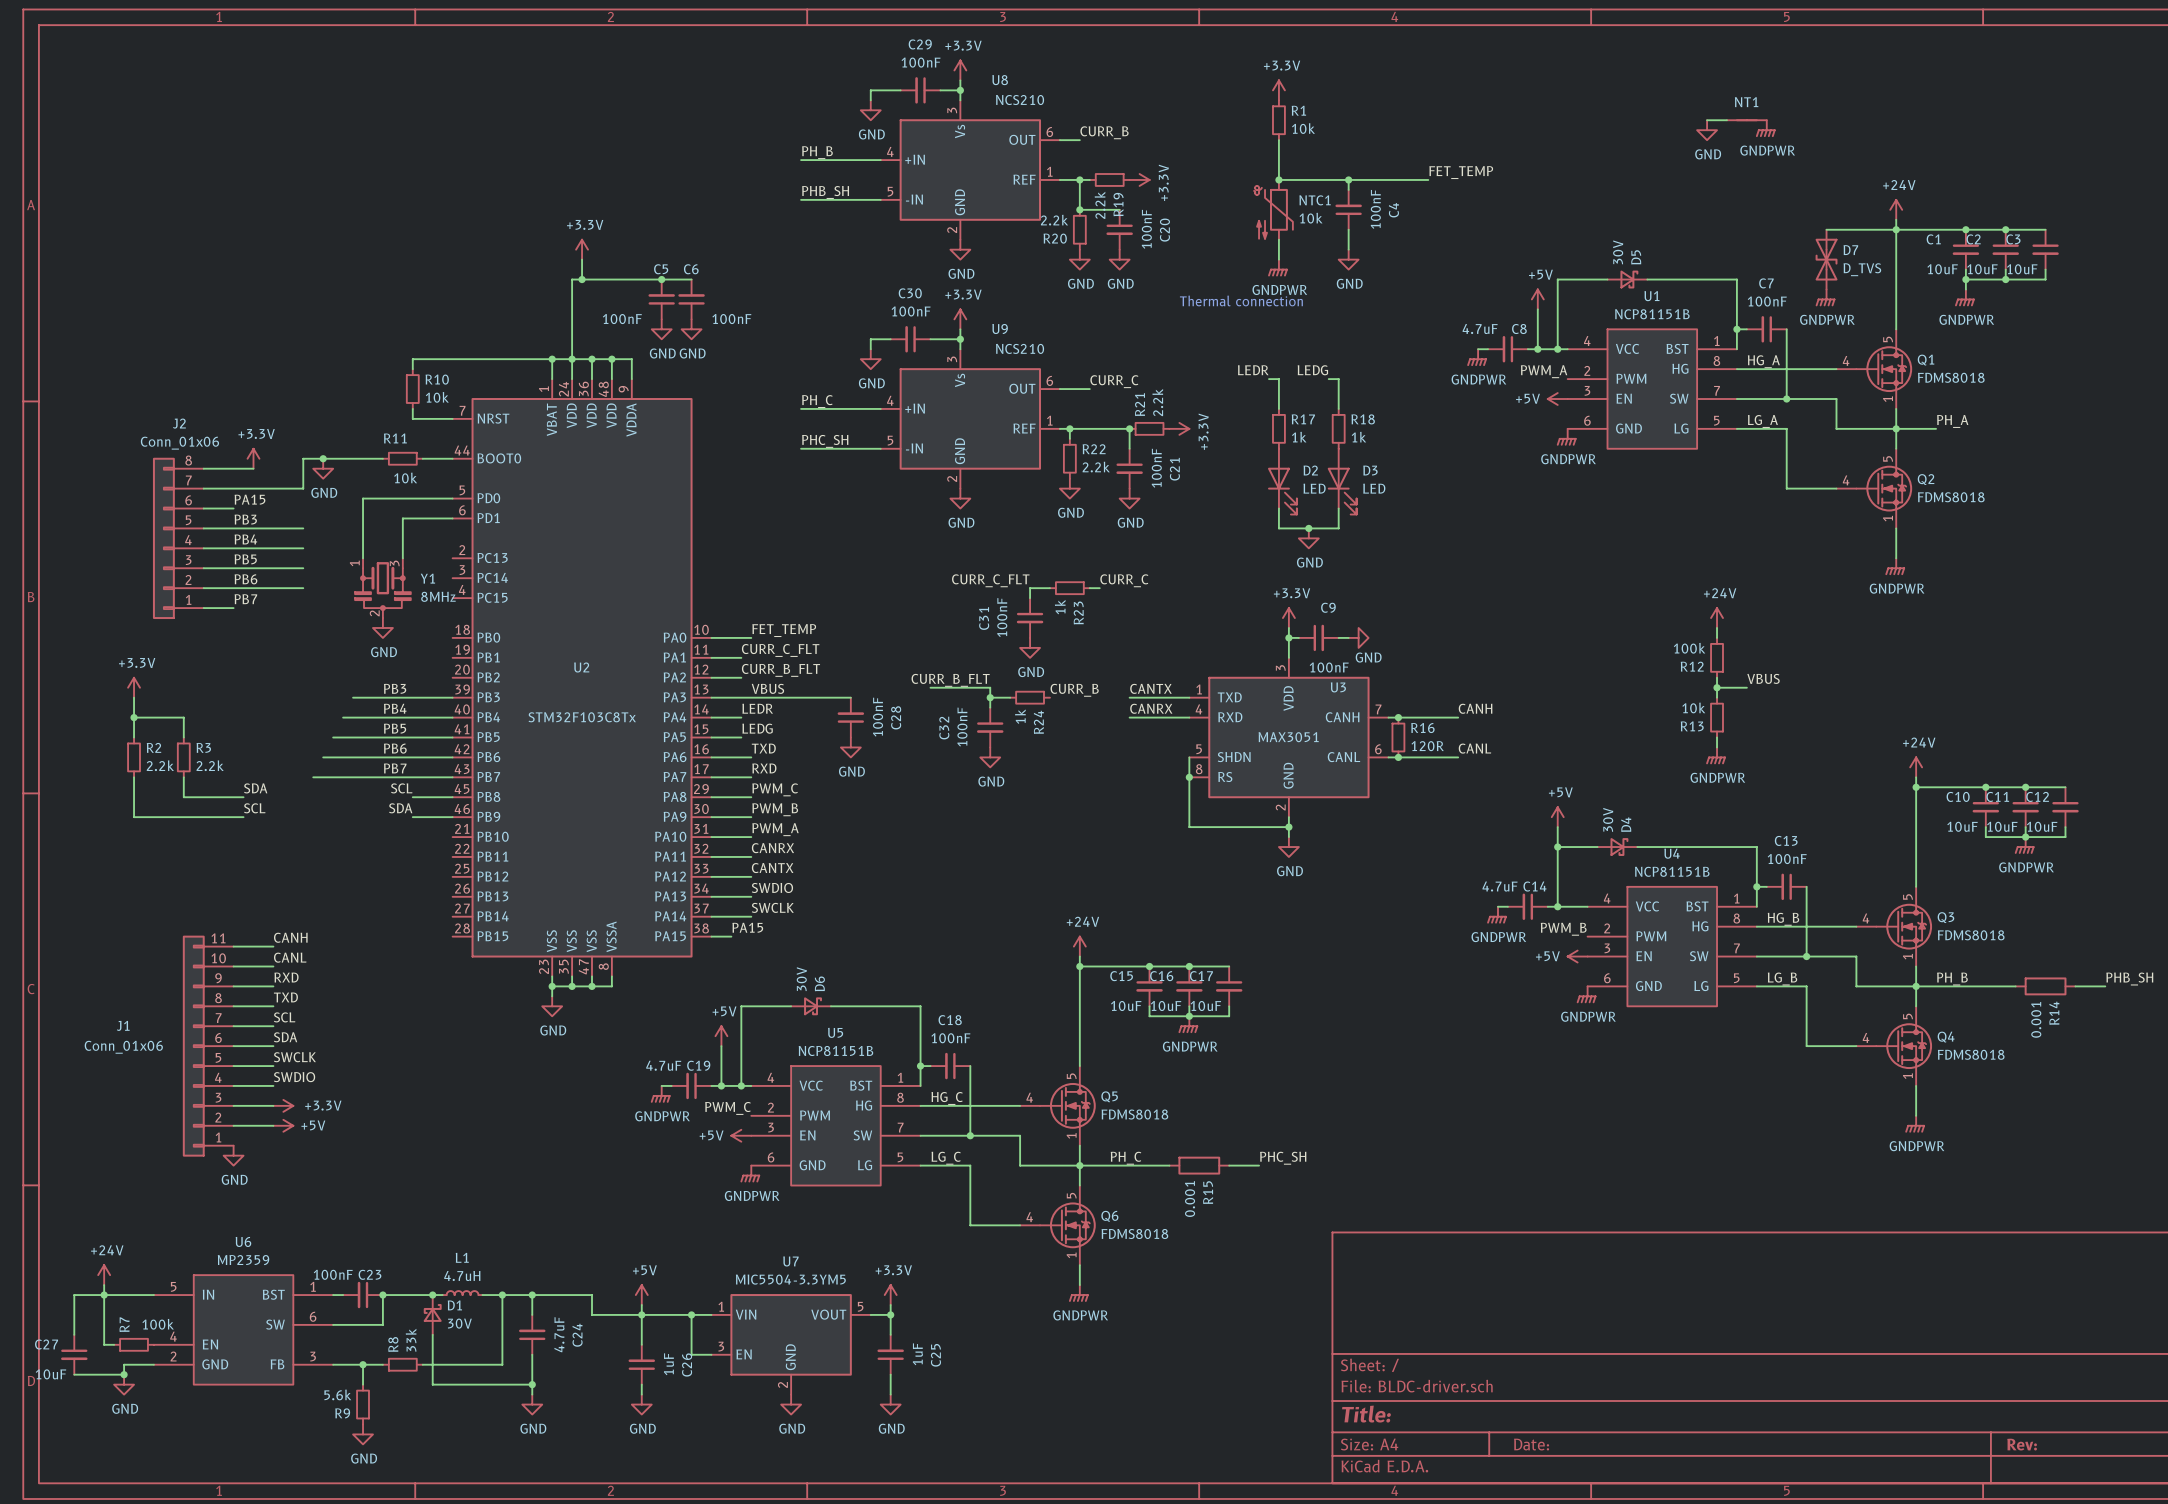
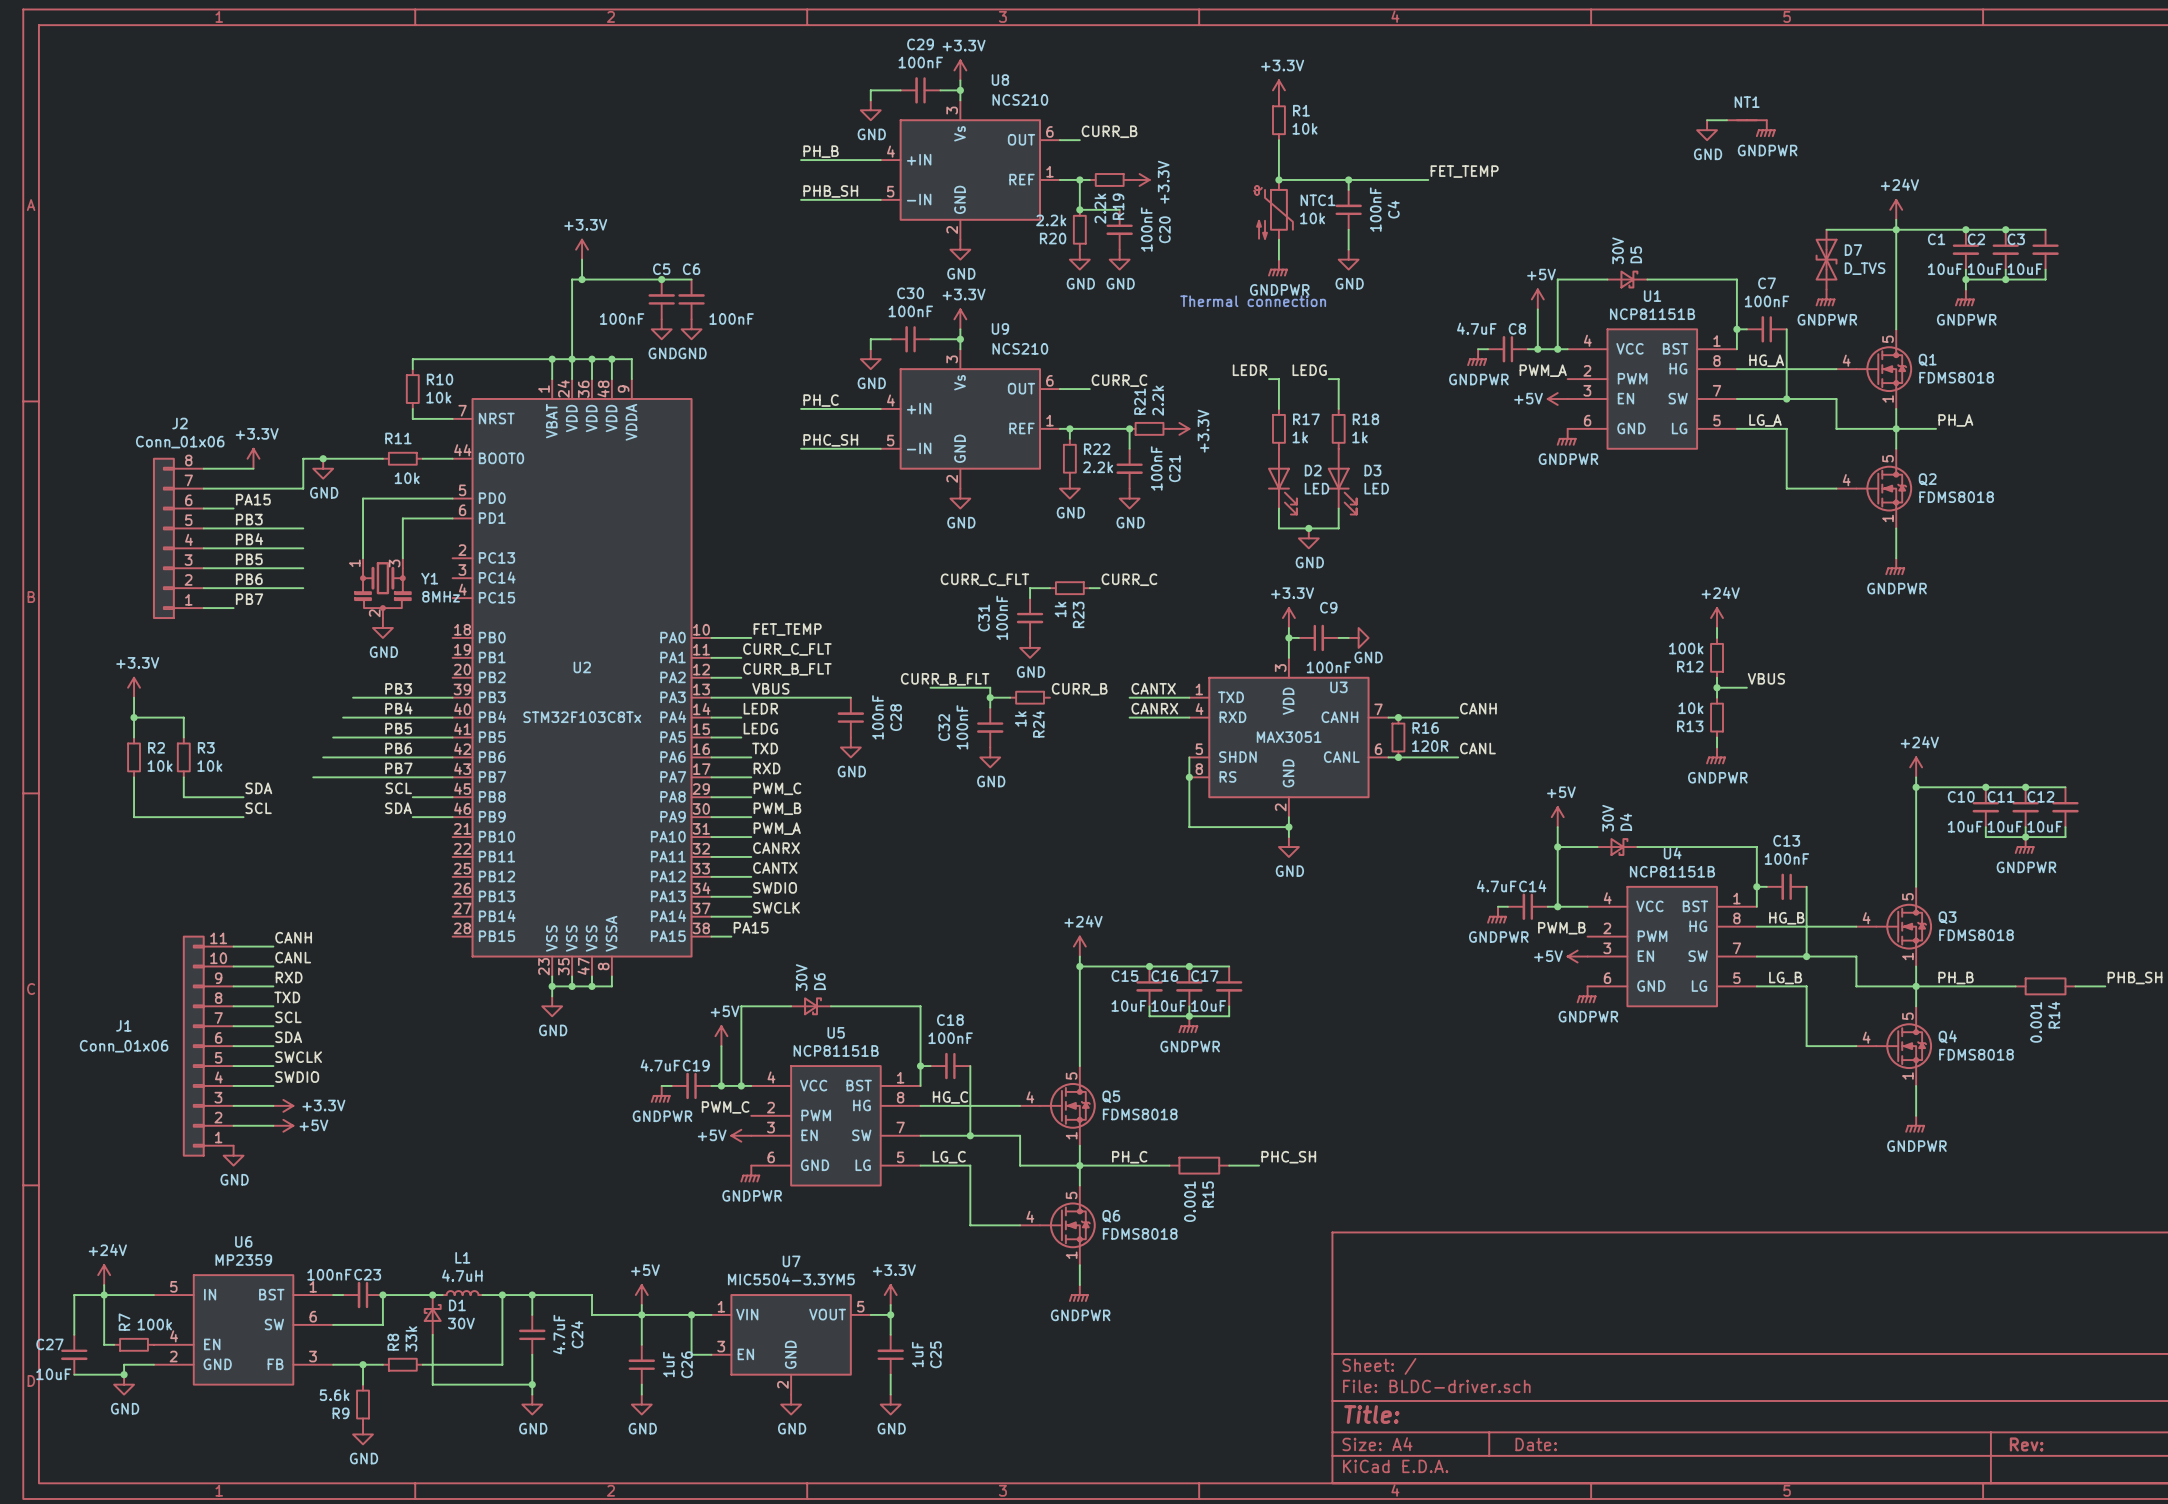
R2 value: 2.2k (160, 765) -> 10k (160, 766)
R3 value: 2.2k (210, 765) -> 10k (209, 766)

